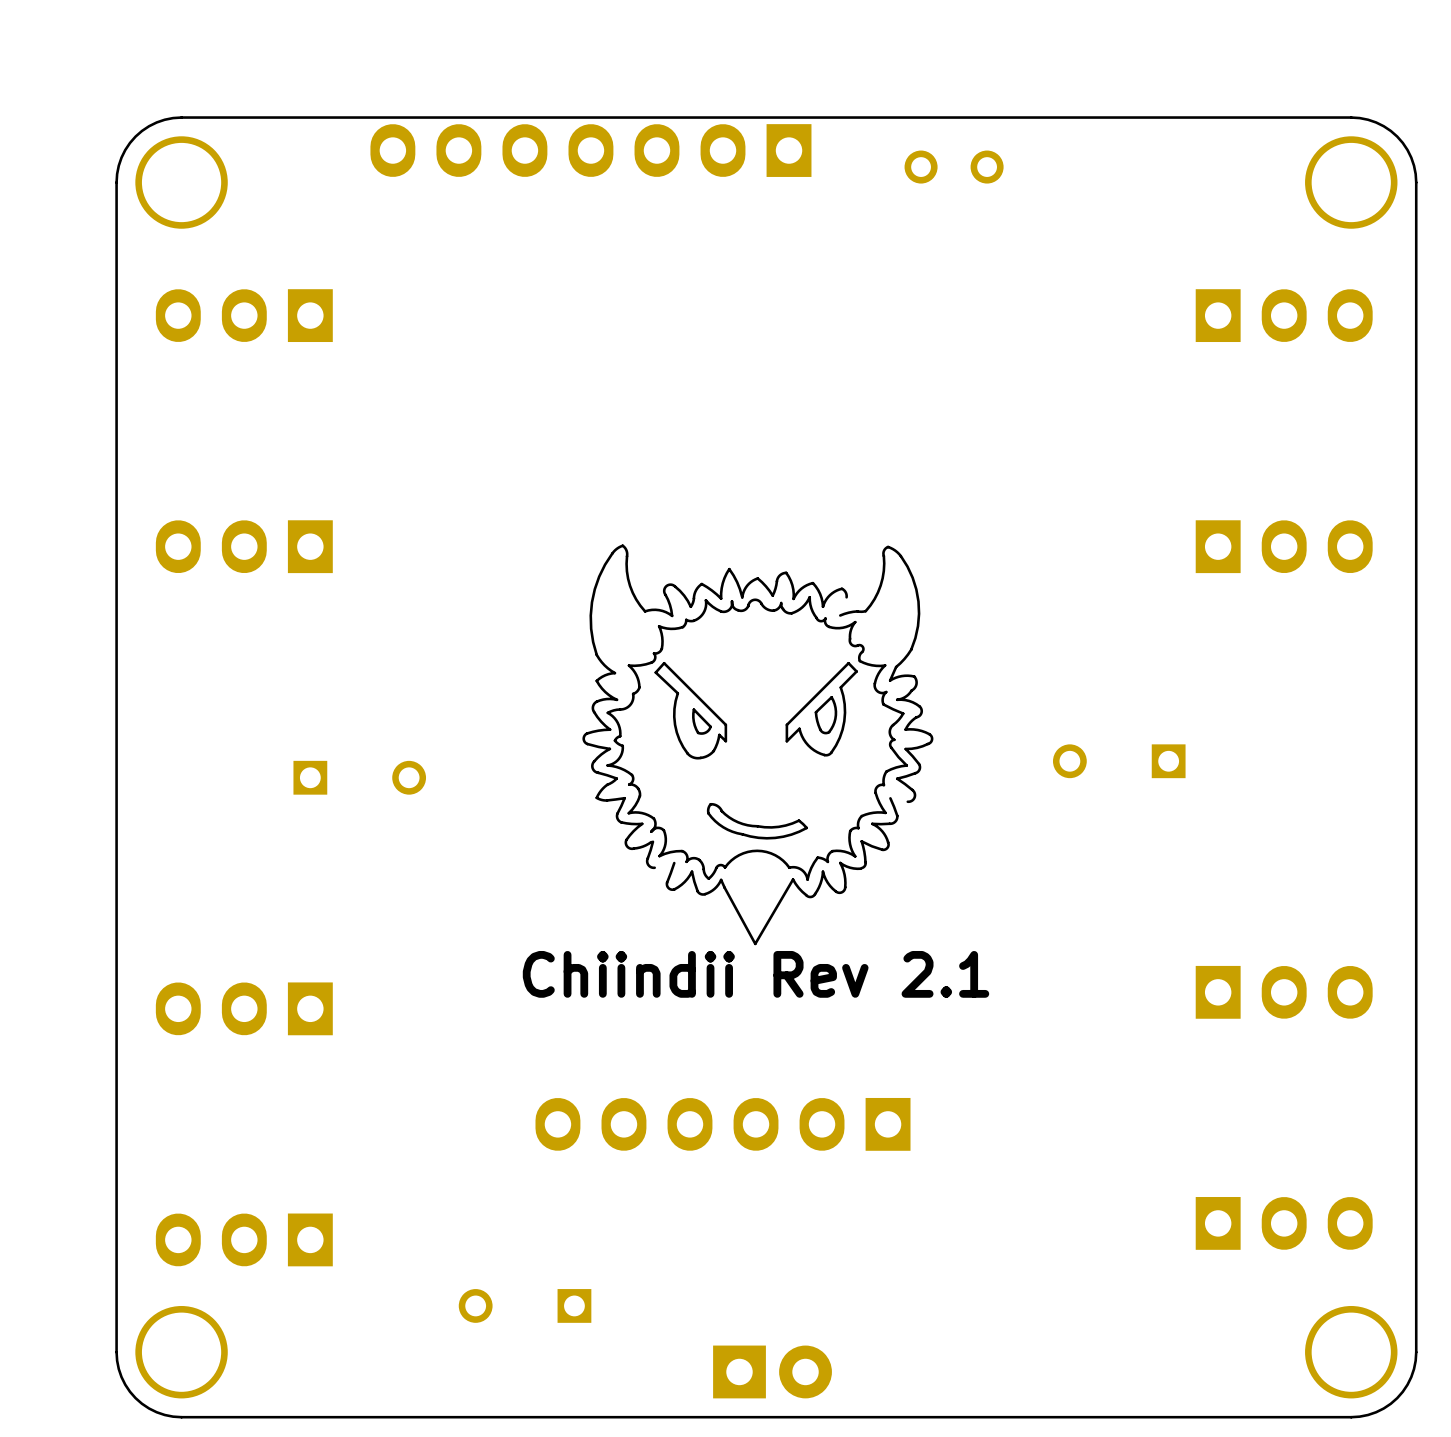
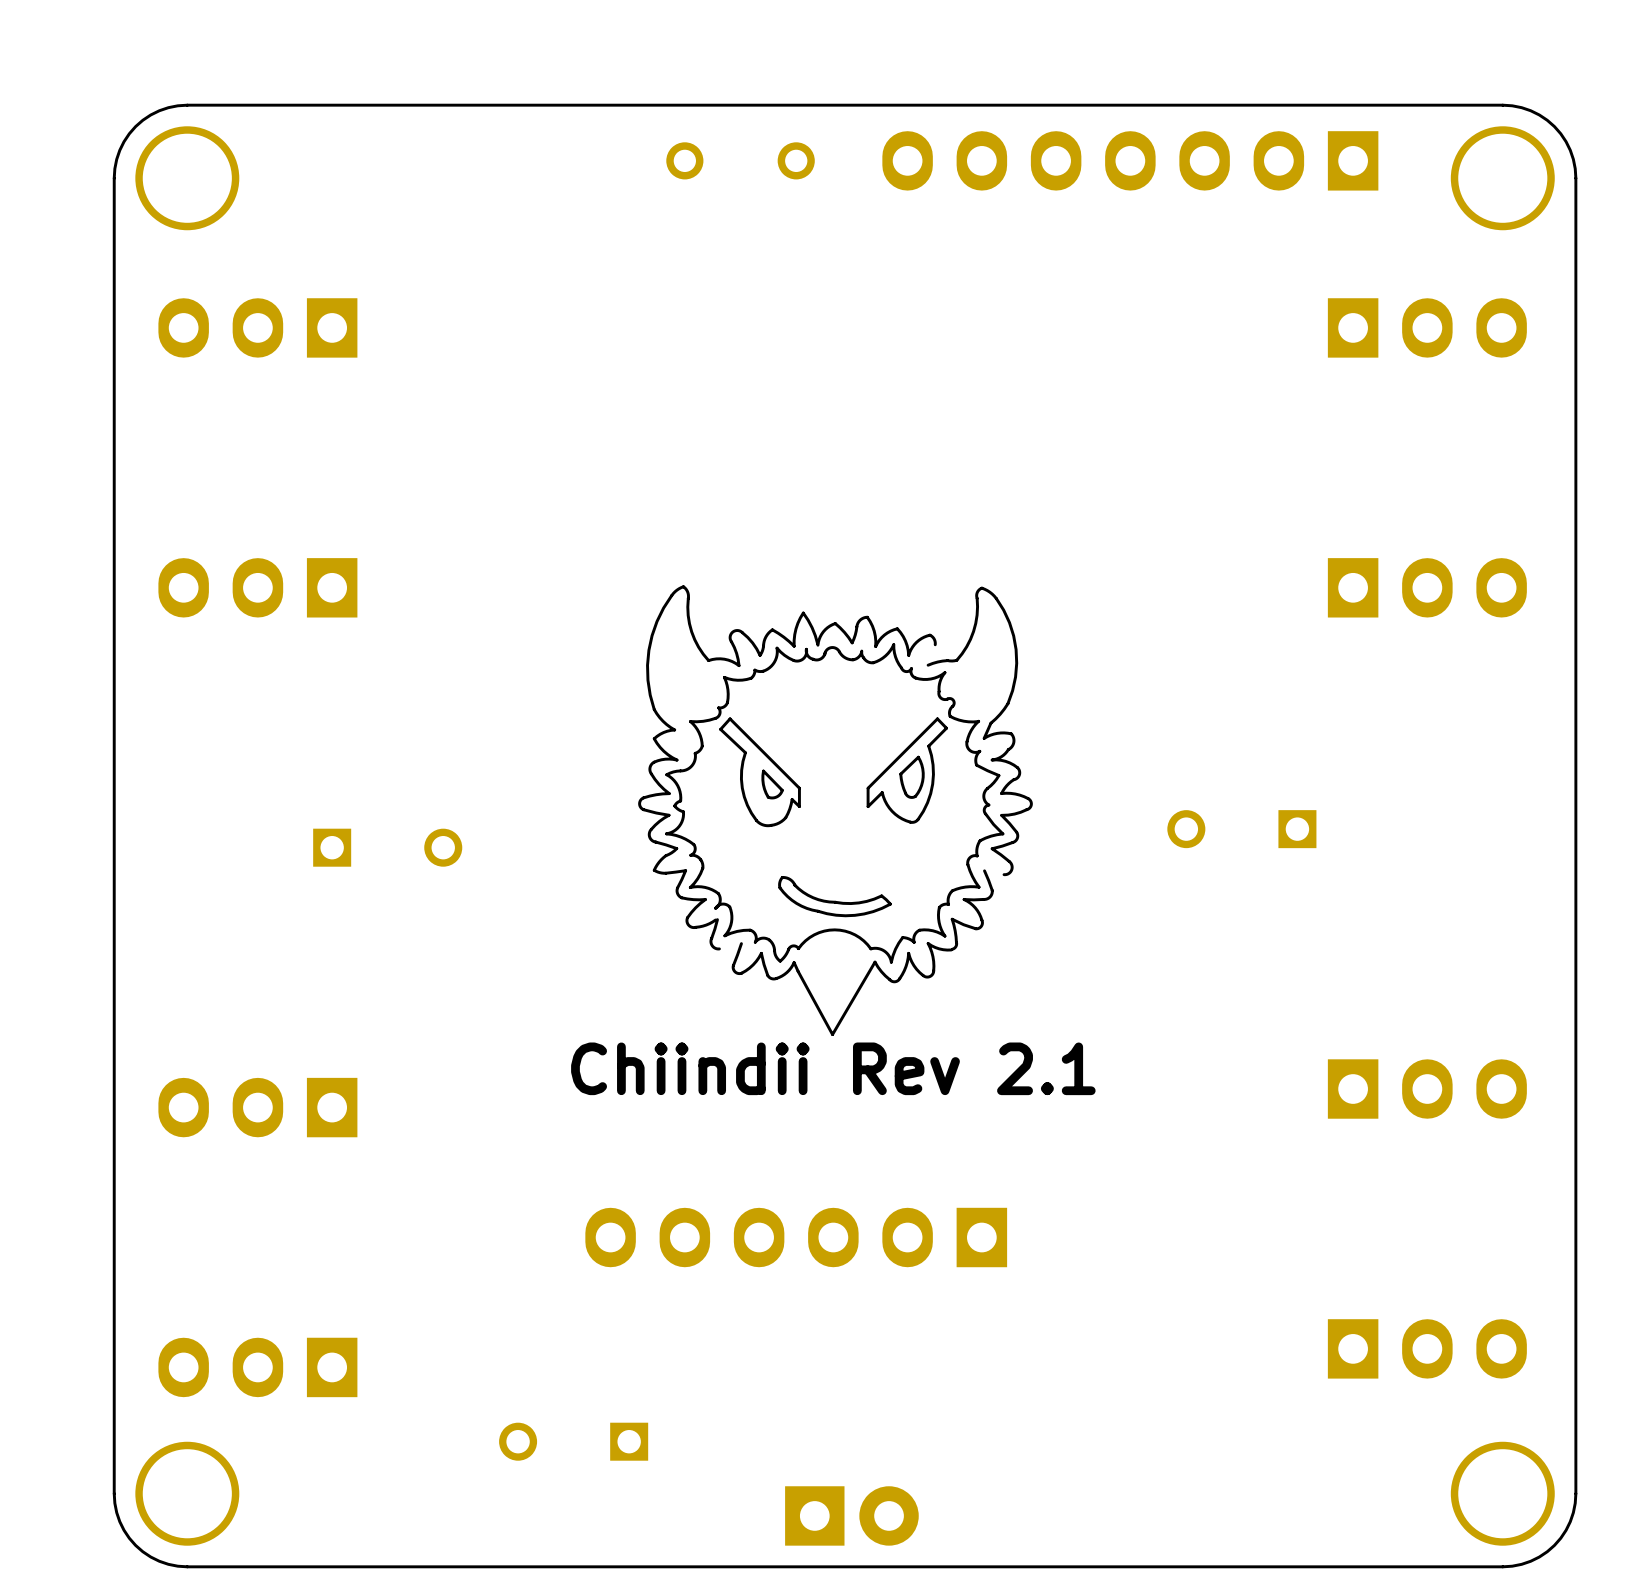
part position: (590, 150) -> (1130, 160)
part: none -> (684, 160)
part: none -> (796, 160)
part: (921, 167) -> none
part: (987, 167) -> none

